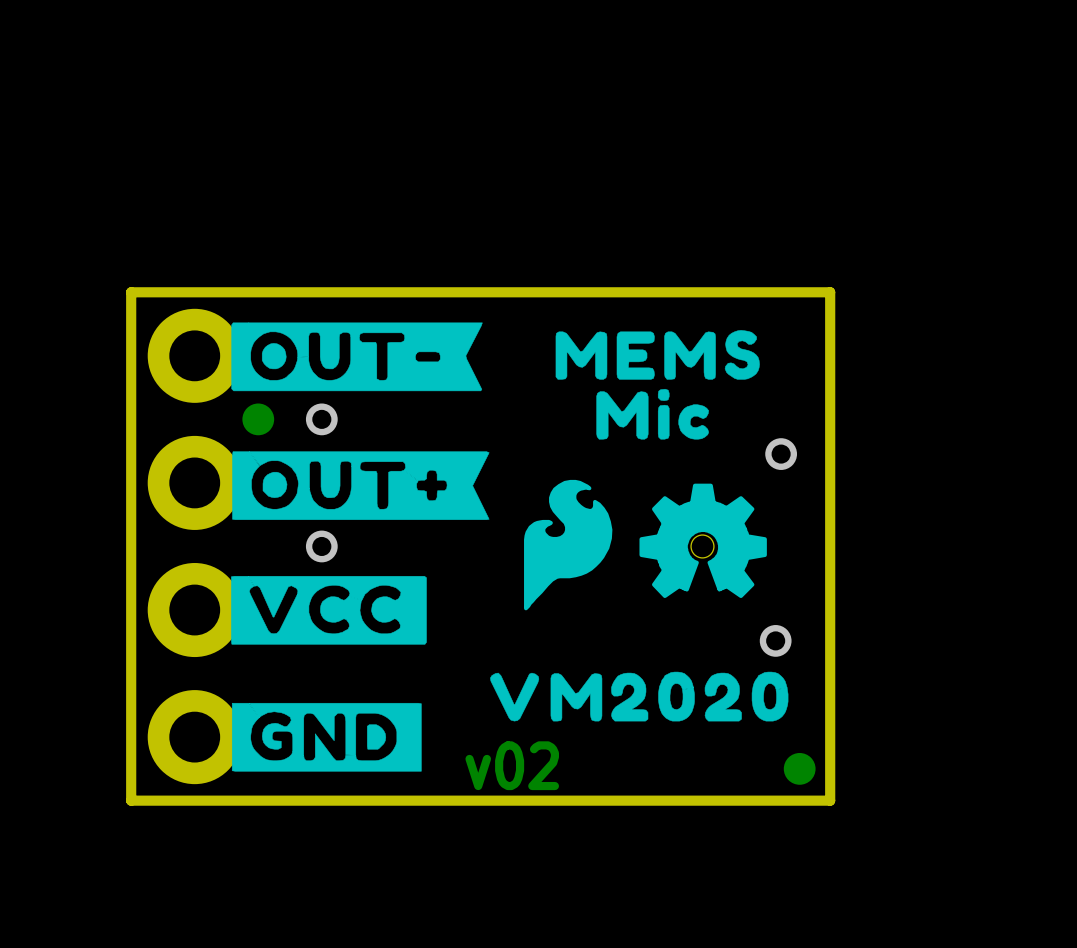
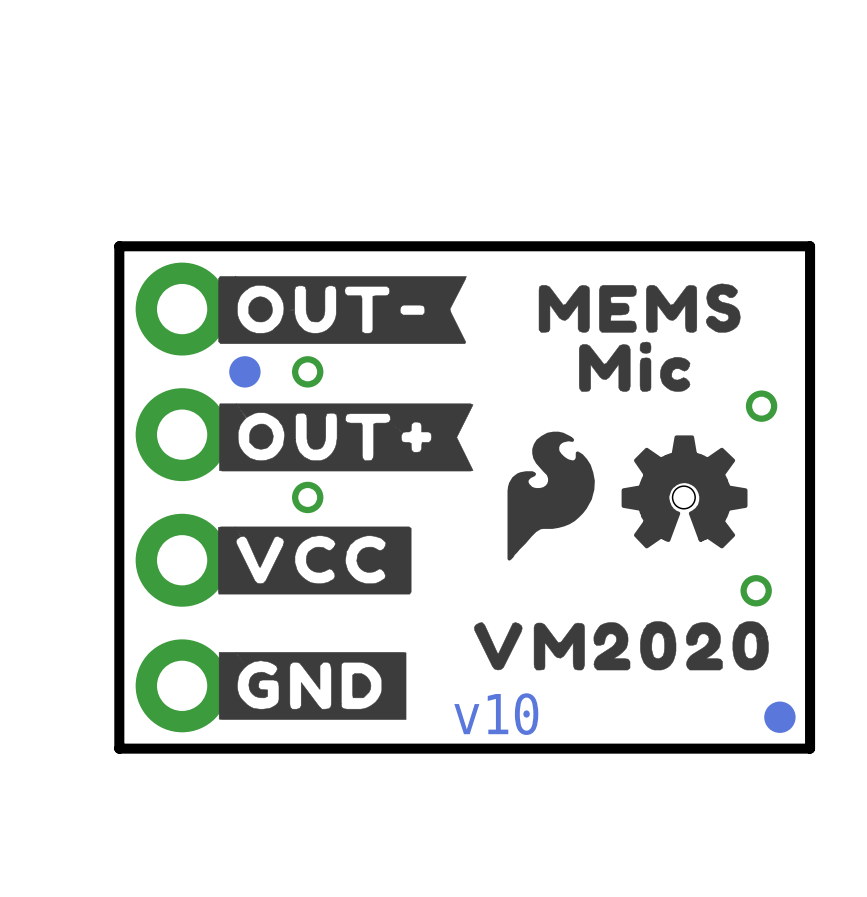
text: v02 (512, 765) -> v10 (496, 714)

